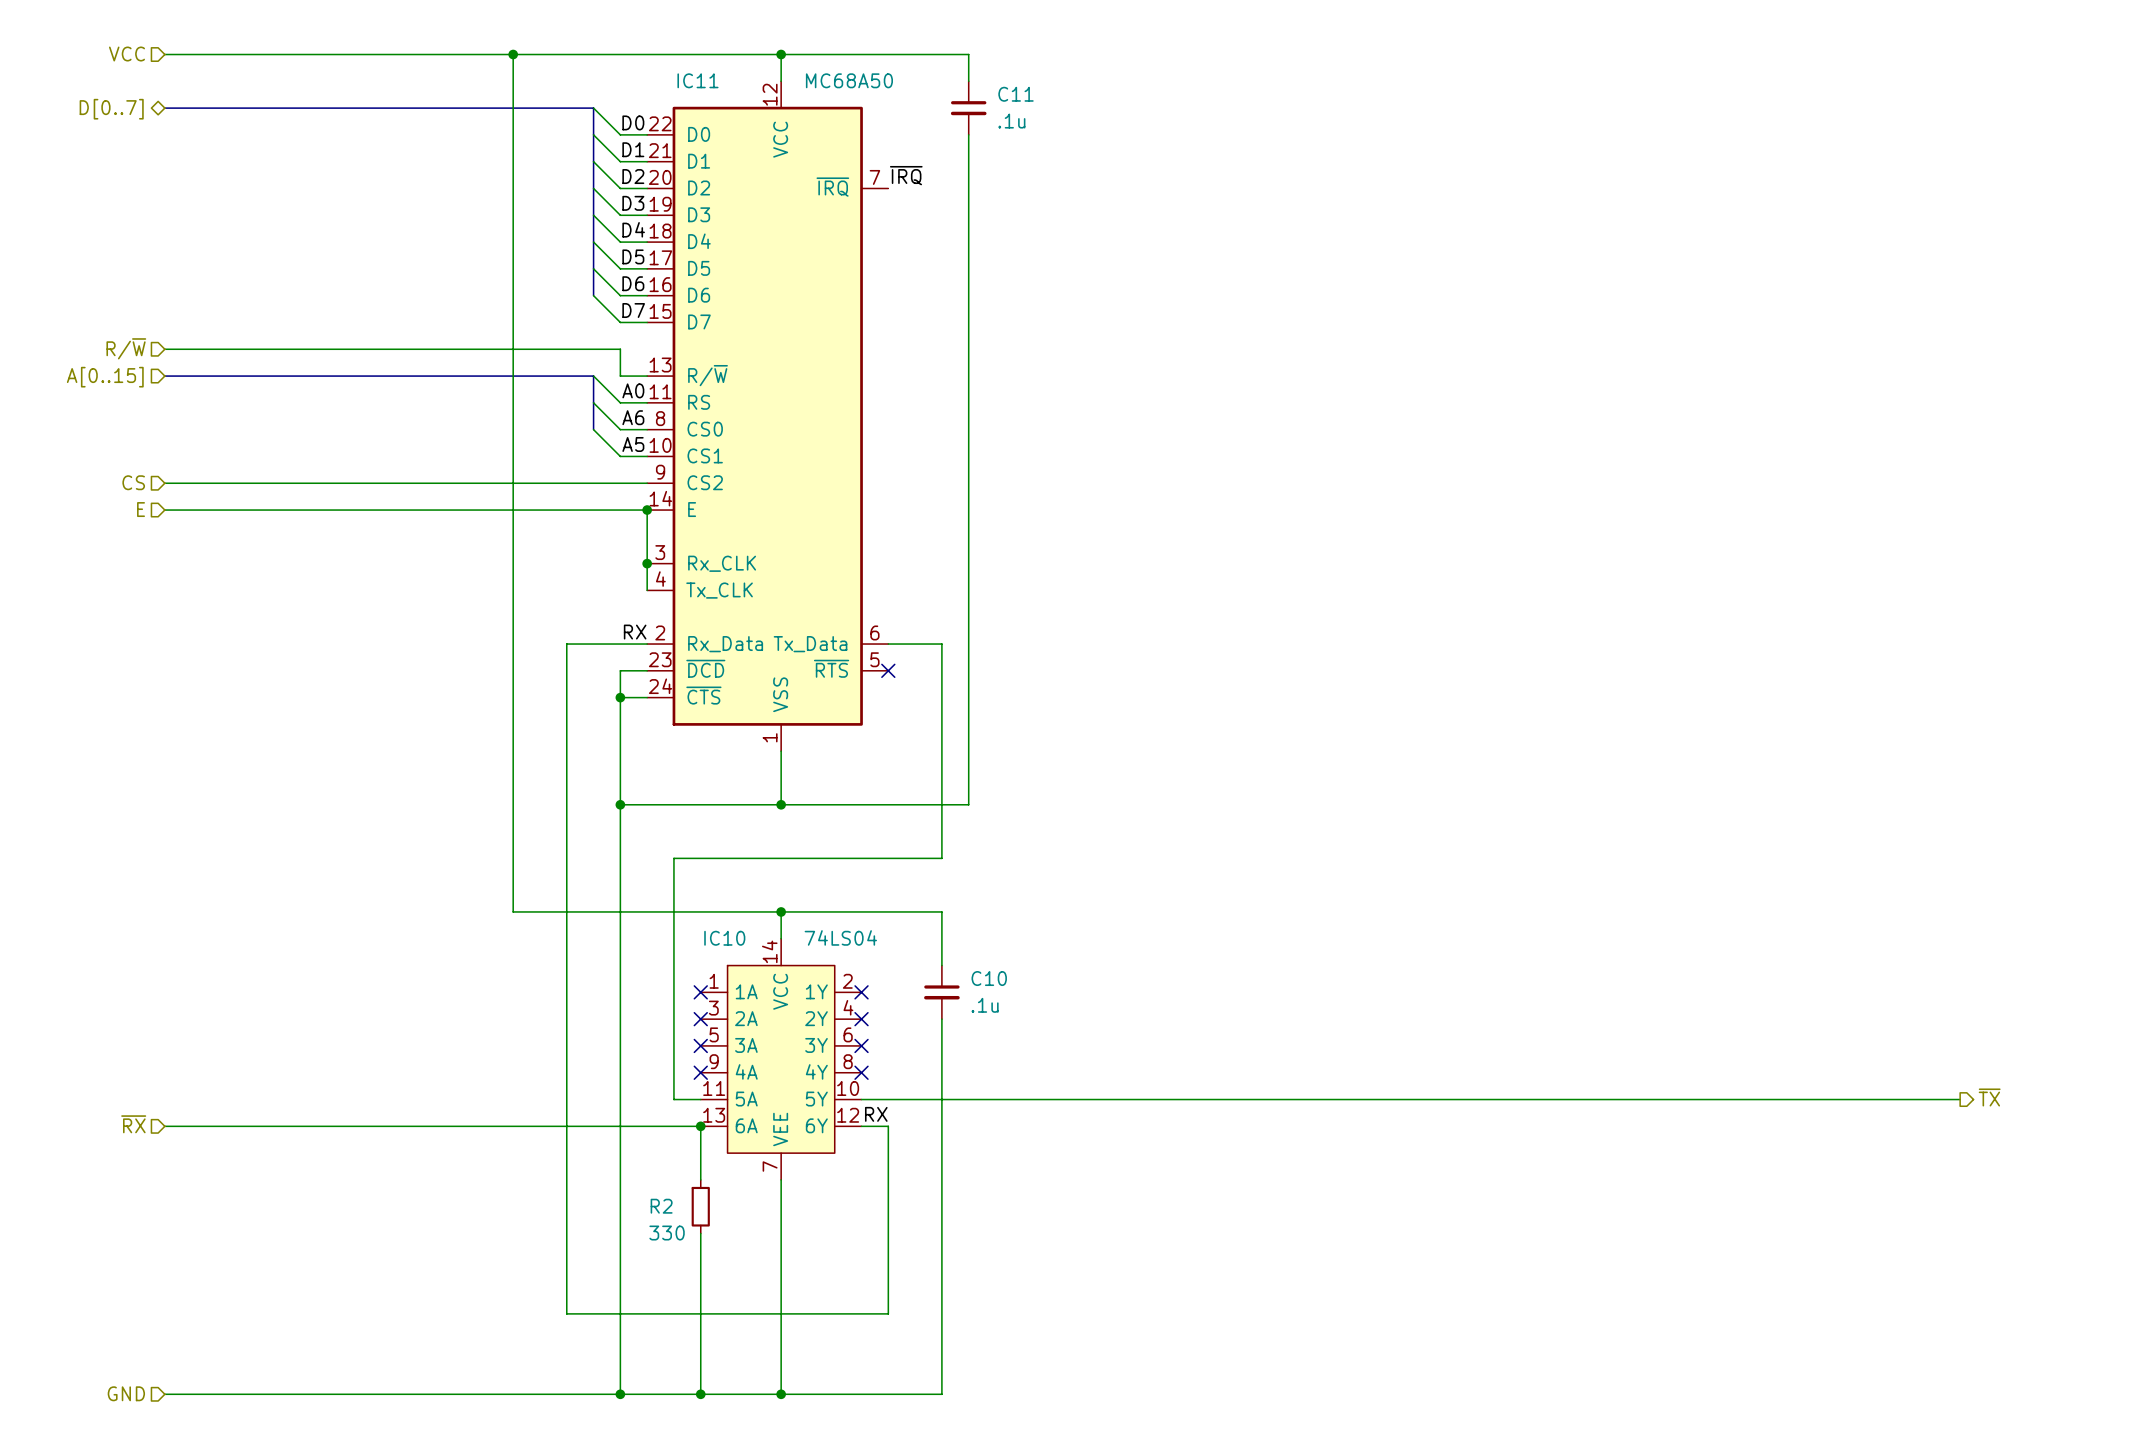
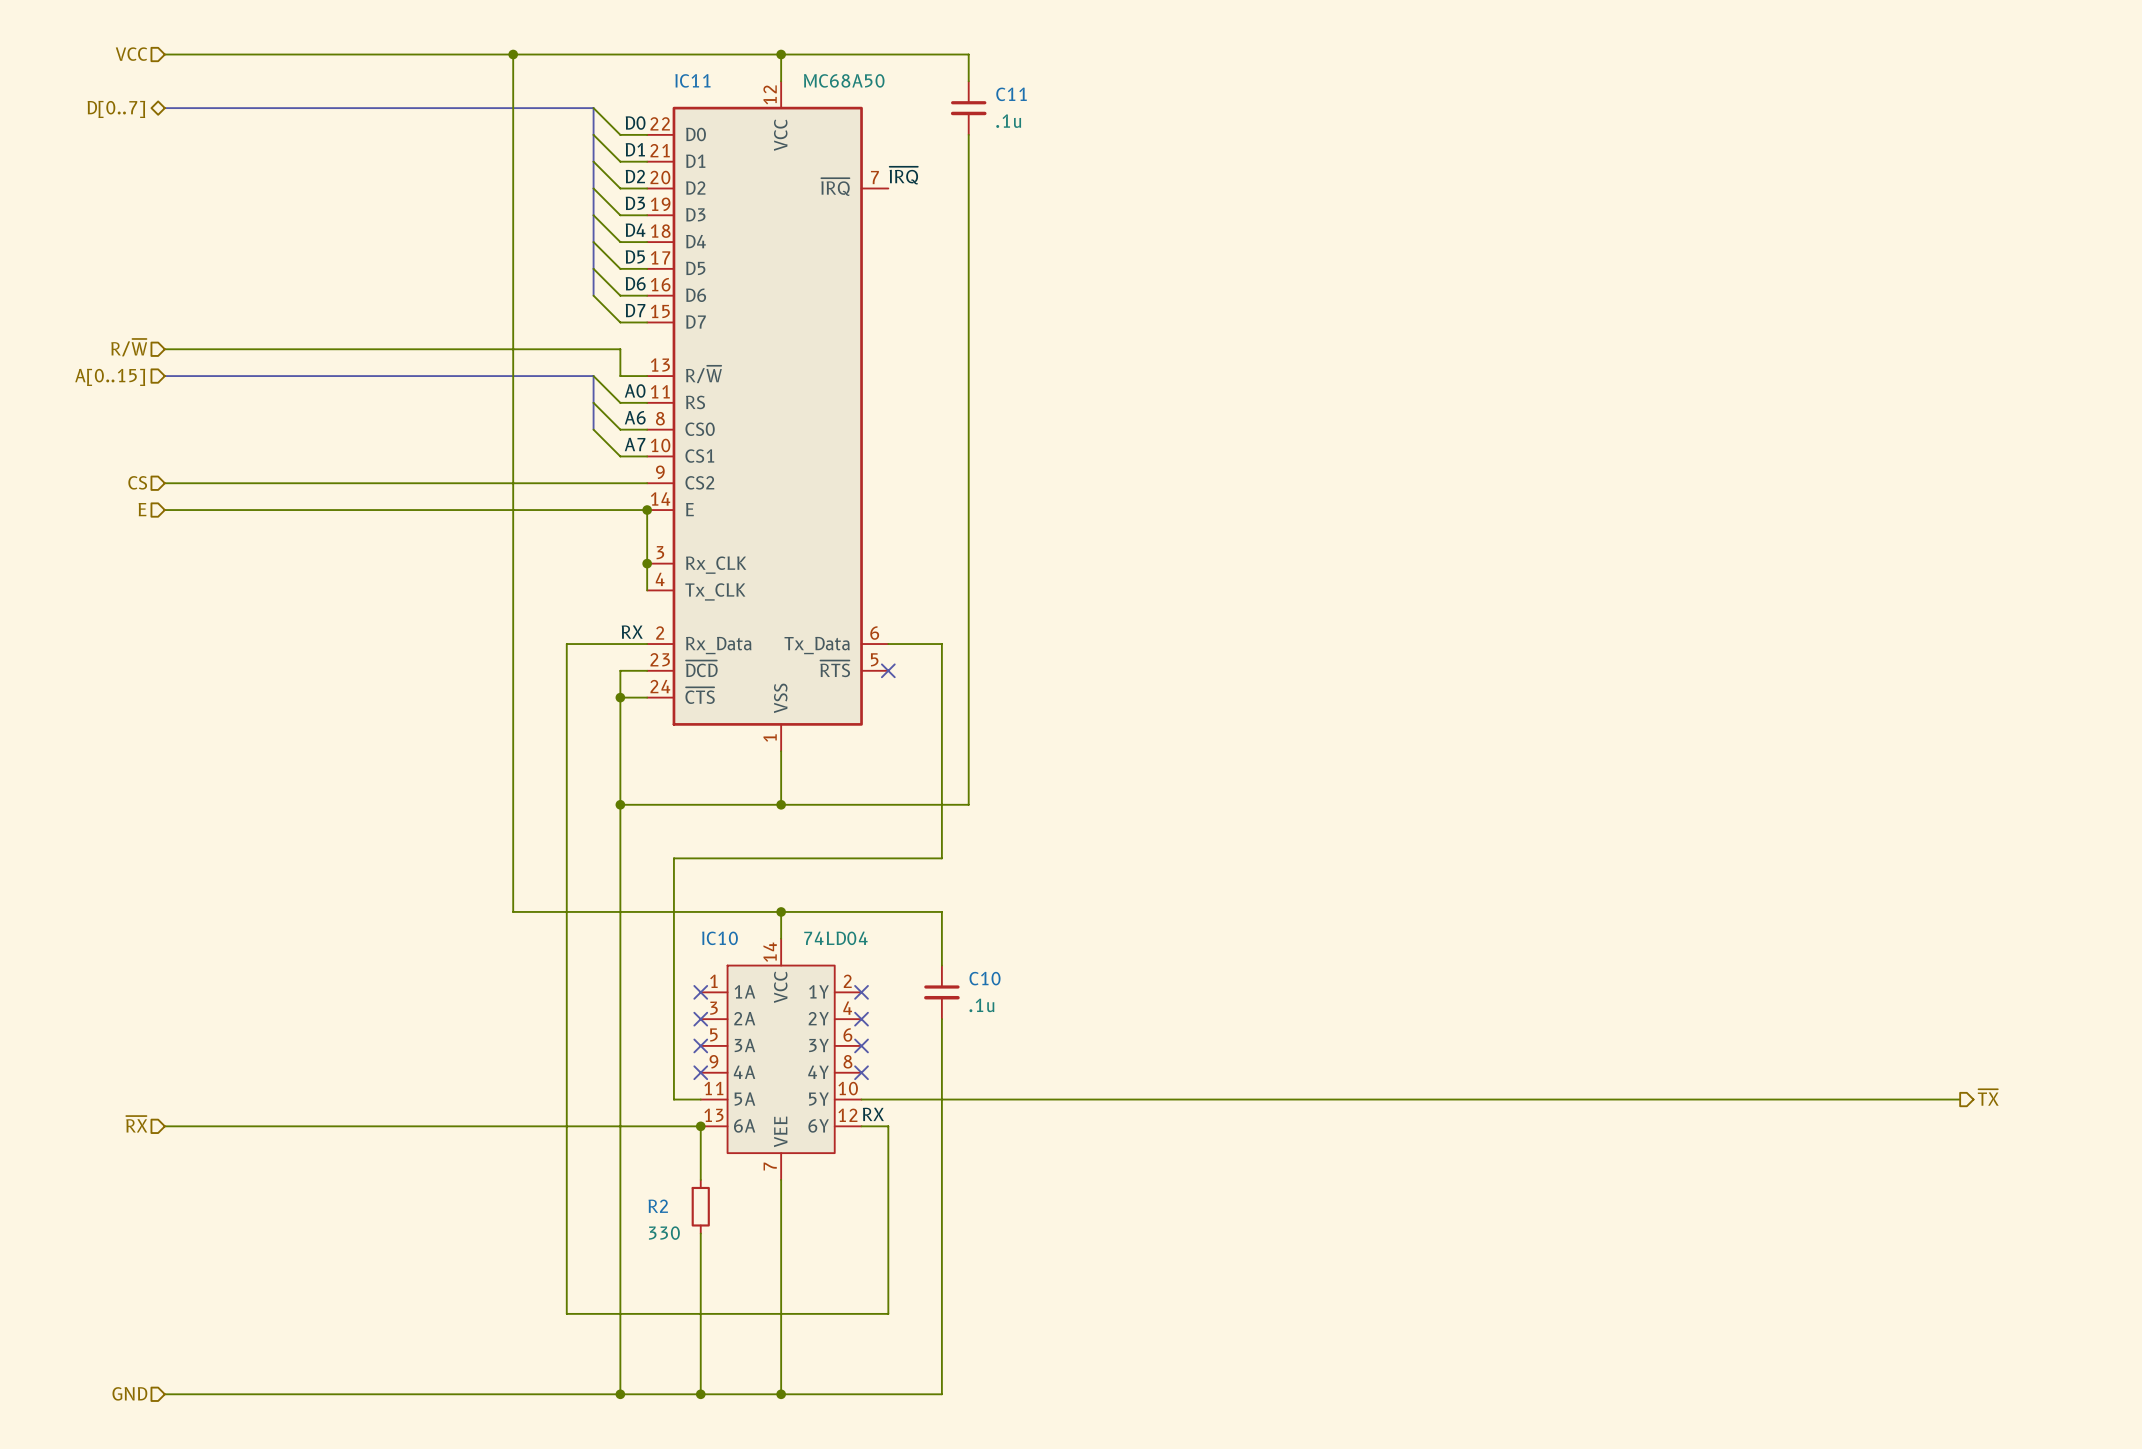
label: A5 (633, 444) -> A7 (635, 444)
IC10 value: 74LS04 (840, 937) -> 74LD04 (835, 938)

